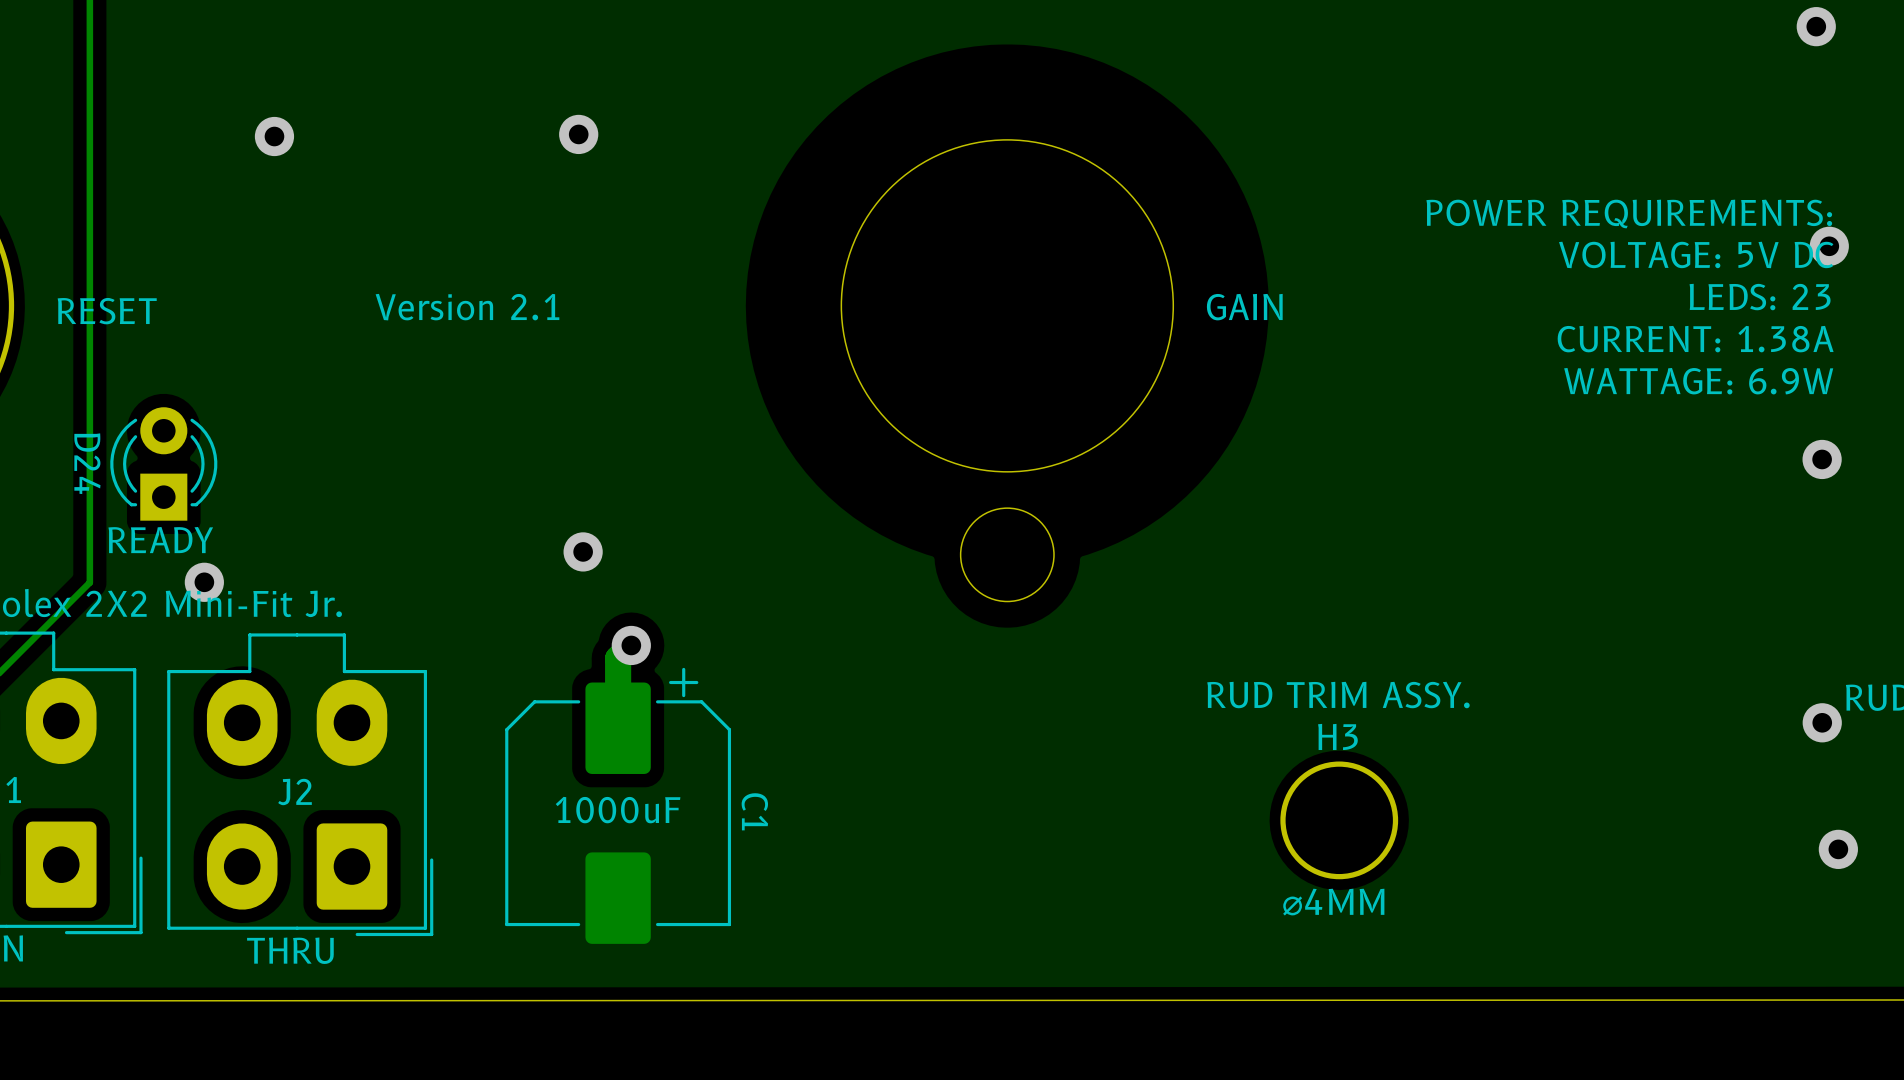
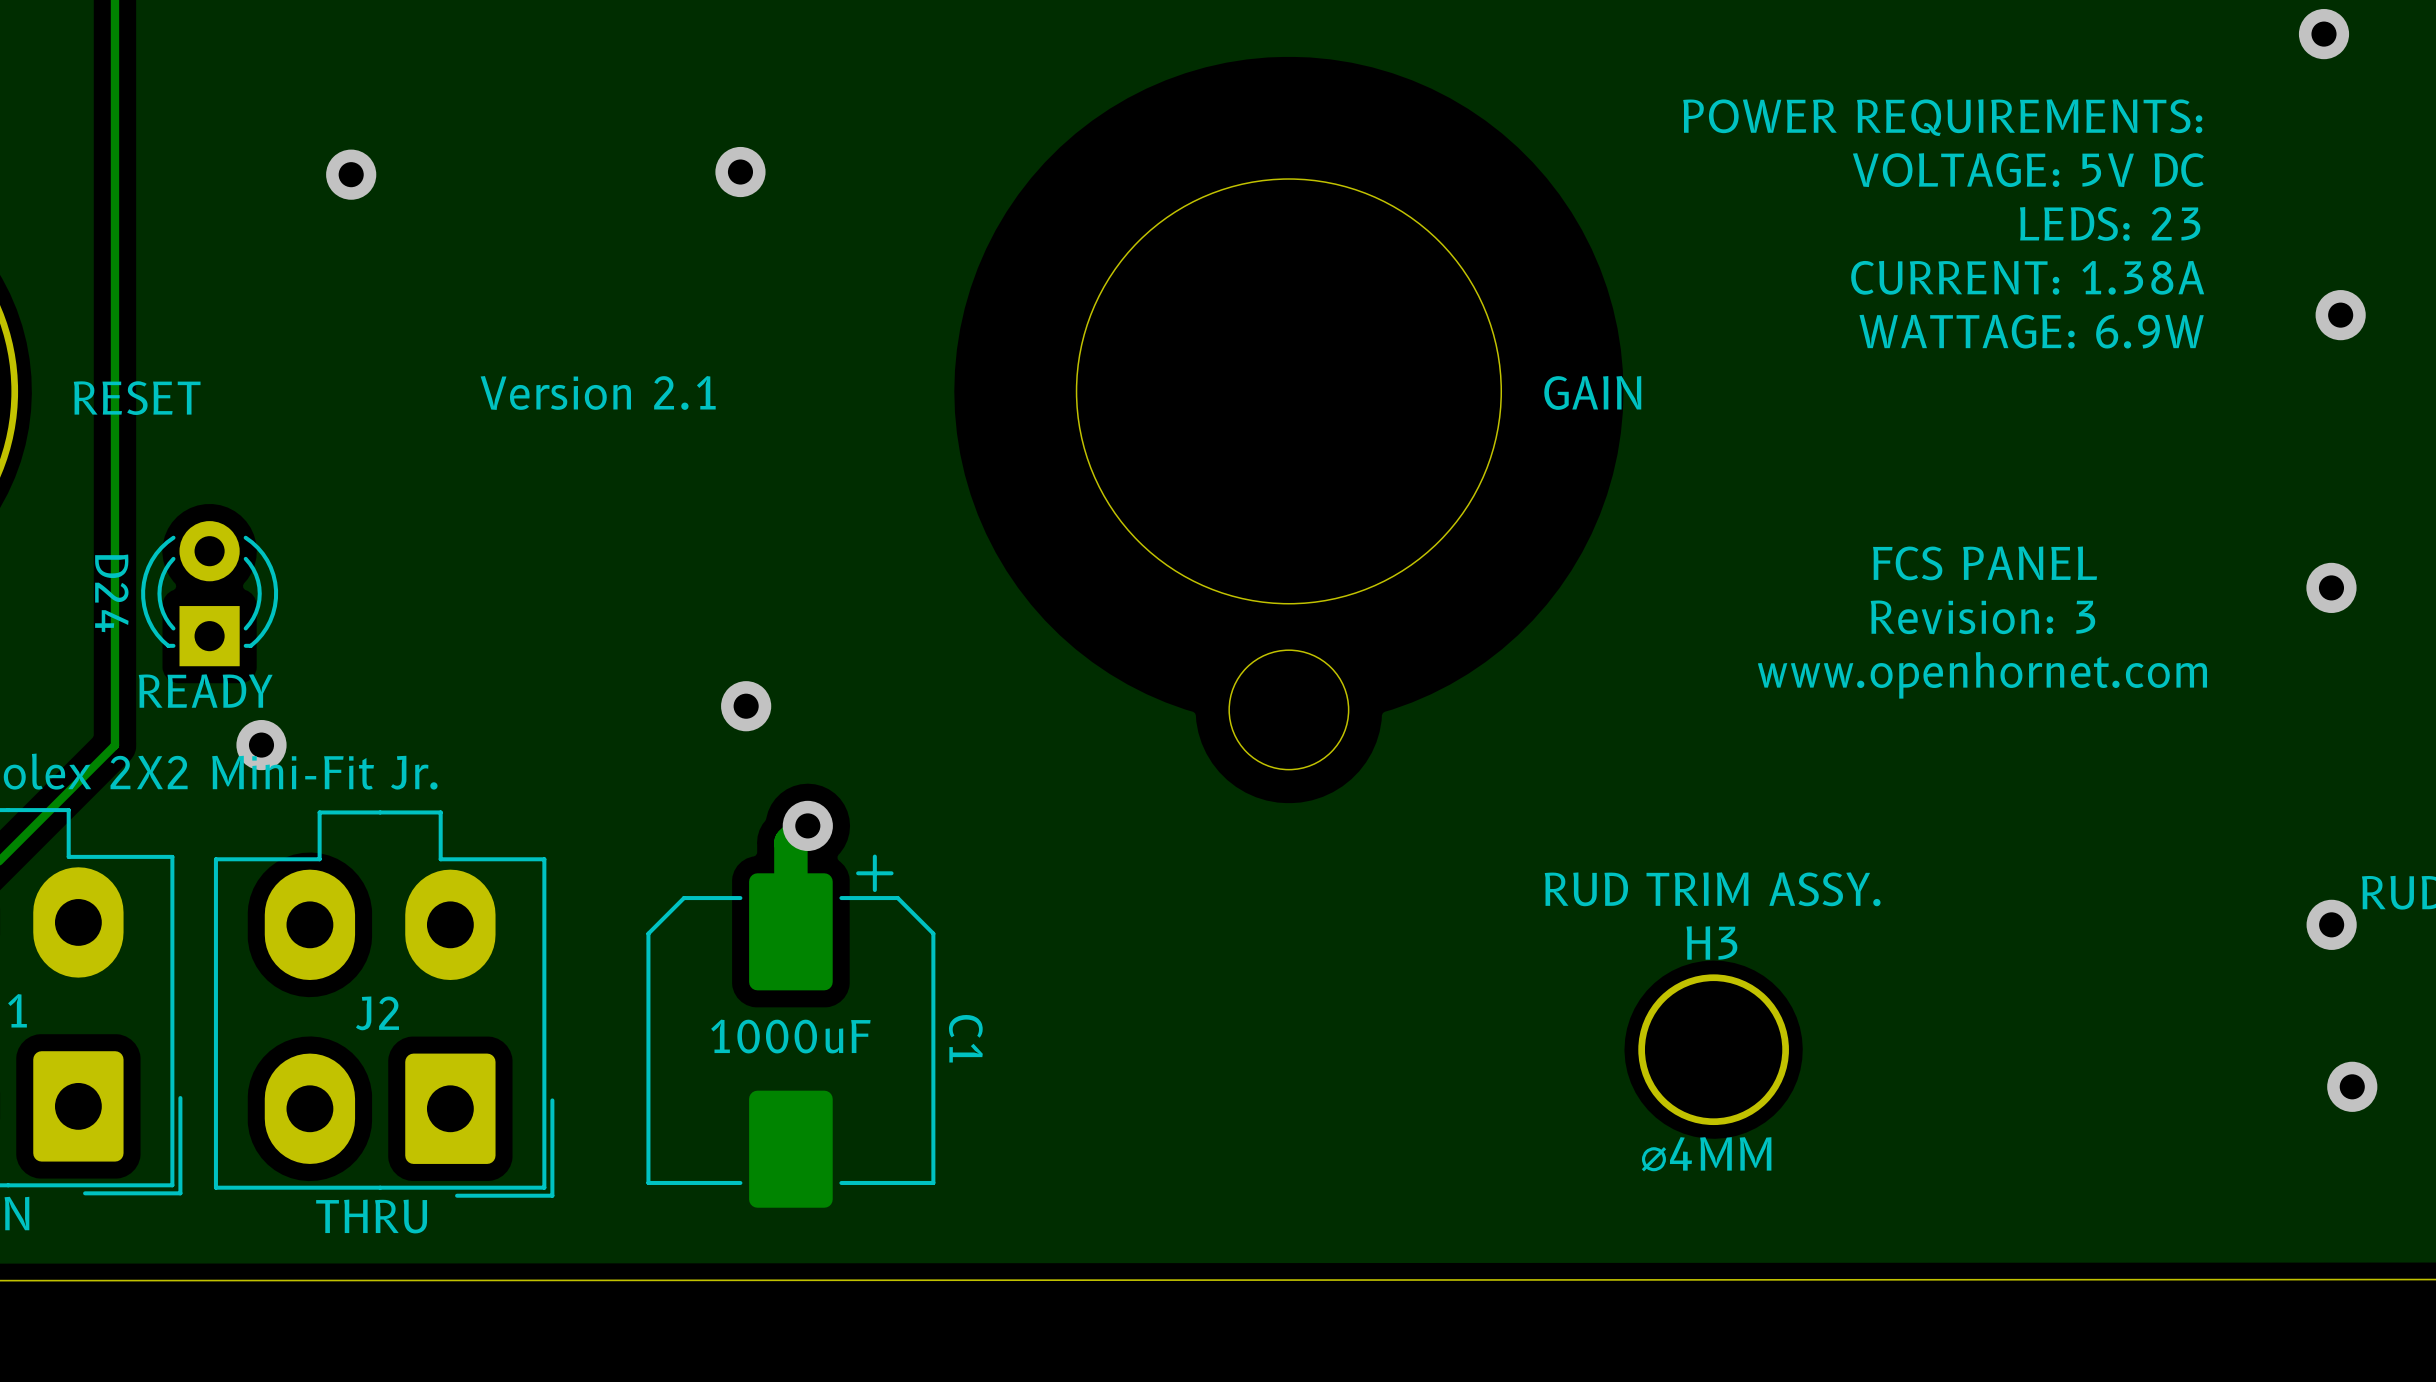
text position: POWER REQUIREMENTS: (1629, 213) -> POWER REQUIREMENTS: (1942, 117)
text position: VOLTAGE: 5V DC (1696, 254) -> VOLTAGE: 5V DC (2028, 170)
text position: LEDS: 23 (1760, 297) -> LEDS: 23 (2110, 223)
text position: CURRENT: 1.38A (1695, 339) -> CURRENT: 1.38A (2027, 277)
text position: WATTAGE: 6.9W (1698, 381) -> WATTAGE: 6.9W (2031, 331)
text: none -> FCS PANEL (1985, 563)
text: none -> Revision: 3 (1982, 617)
text: none -> www.openhornet.com (1982, 675)

